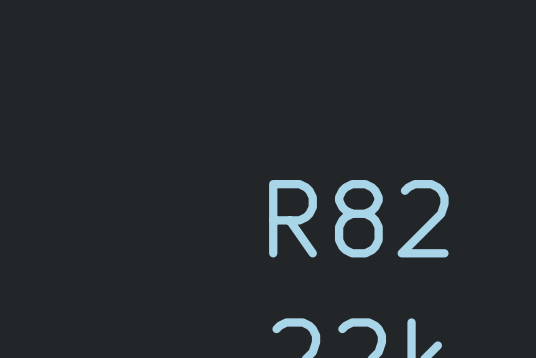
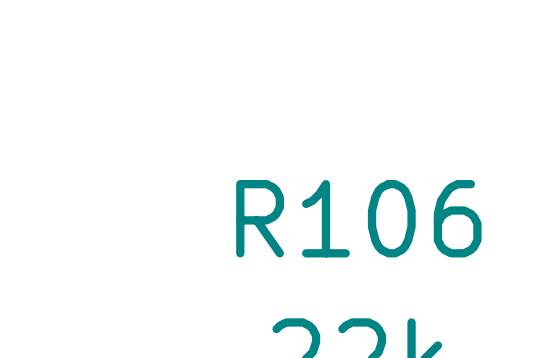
R82 name: R82 (358, 218) -> R106 (358, 218)

